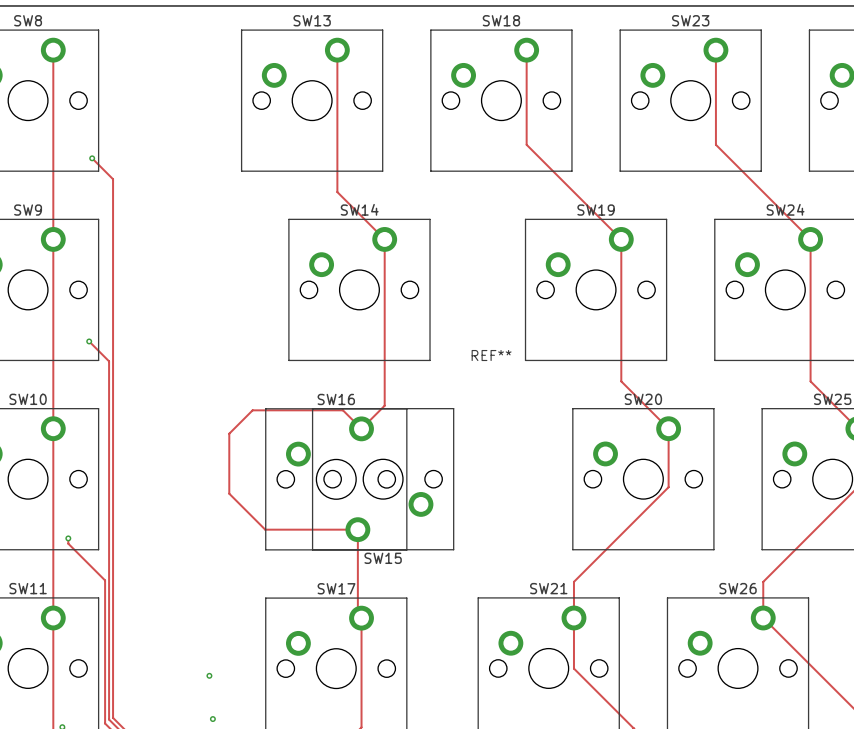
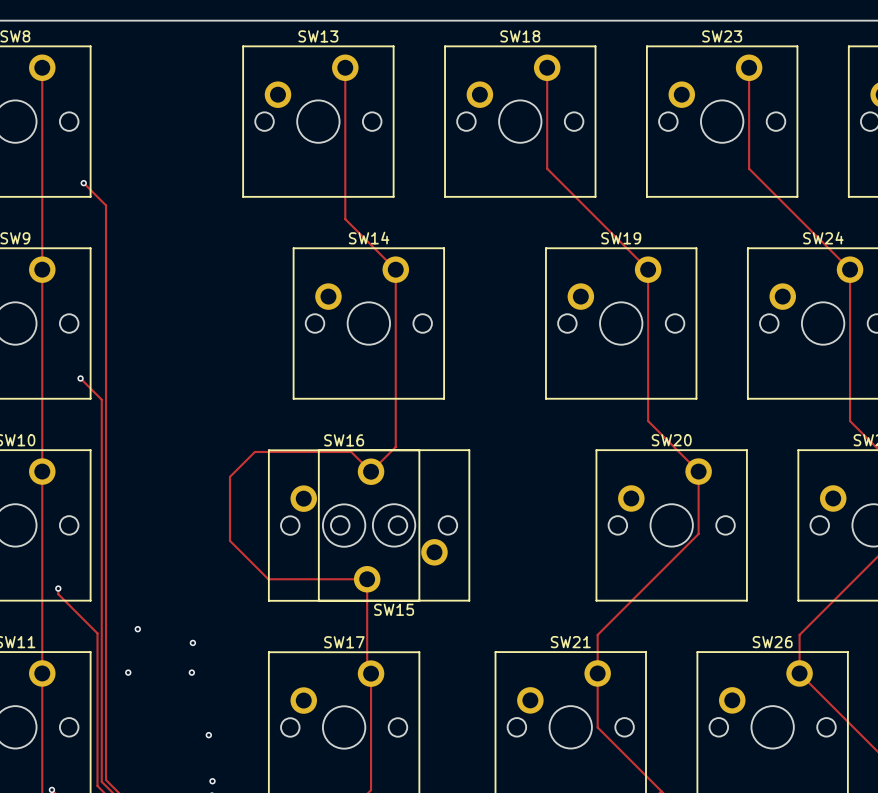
REF**: (491, 355) -> none
via: none -> (137, 629)
via: none -> (192, 642)
via: none -> (128, 672)
via: none -> (191, 672)

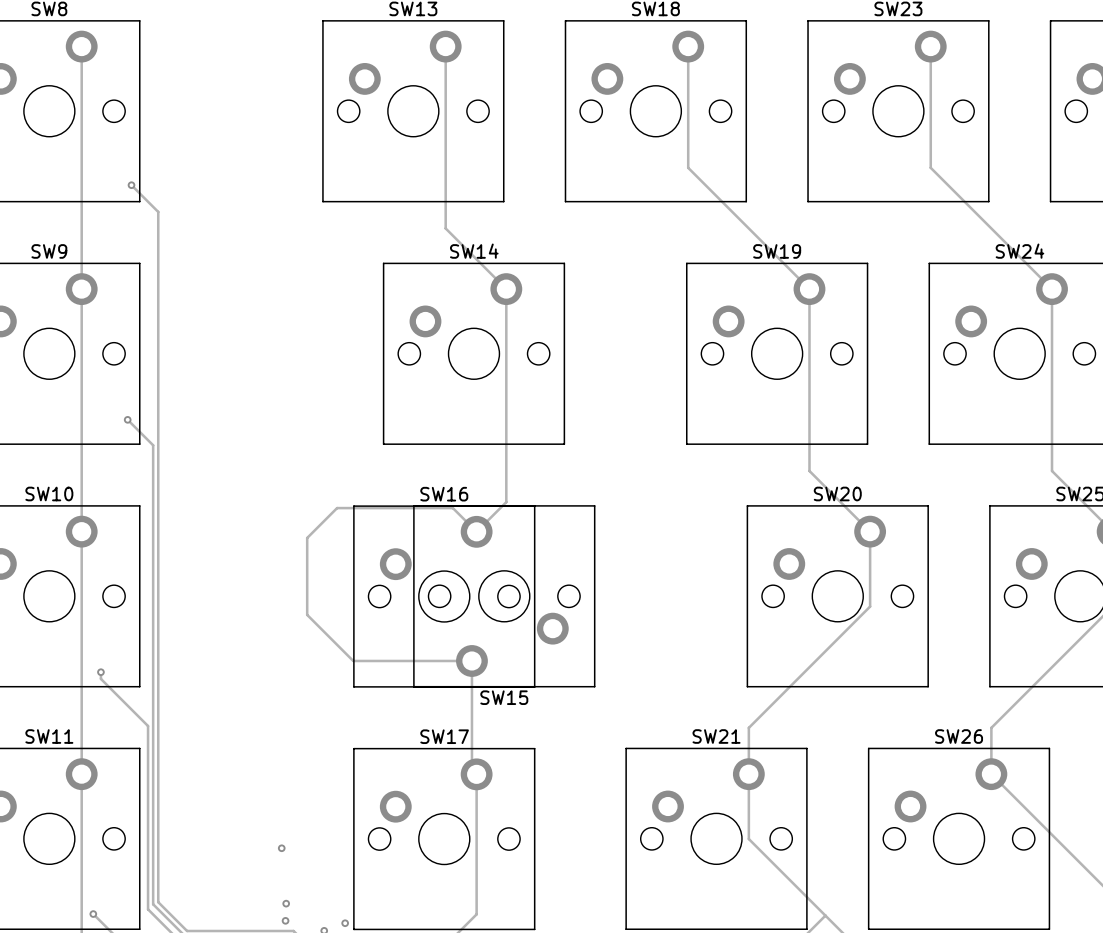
via: (137, 629) -> none
via: (192, 642) -> none
via: (128, 672) -> none
via: (191, 672) -> none

